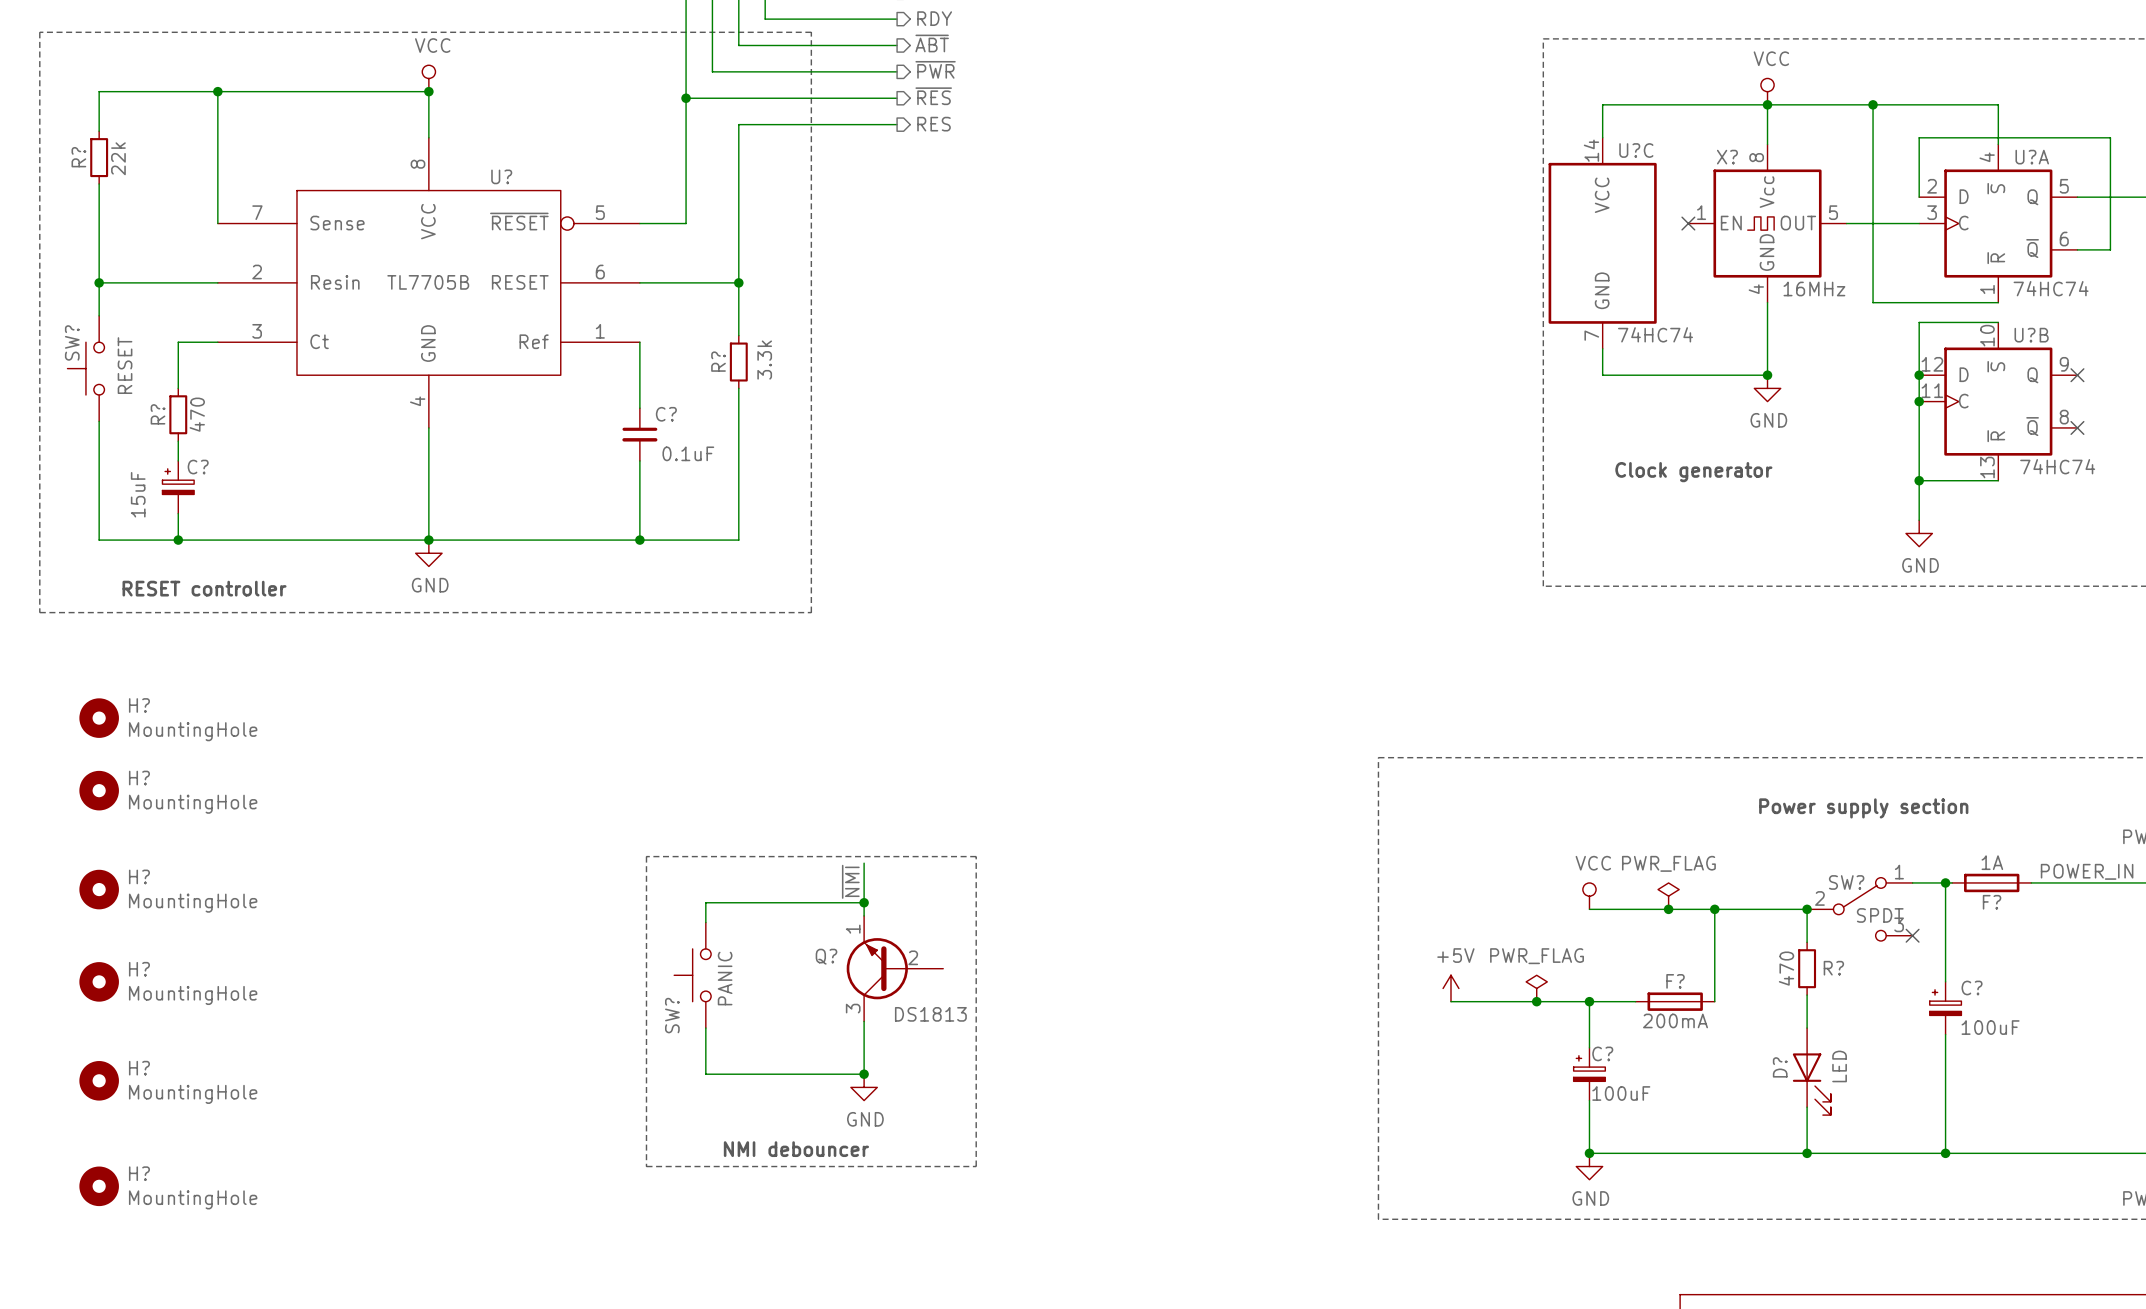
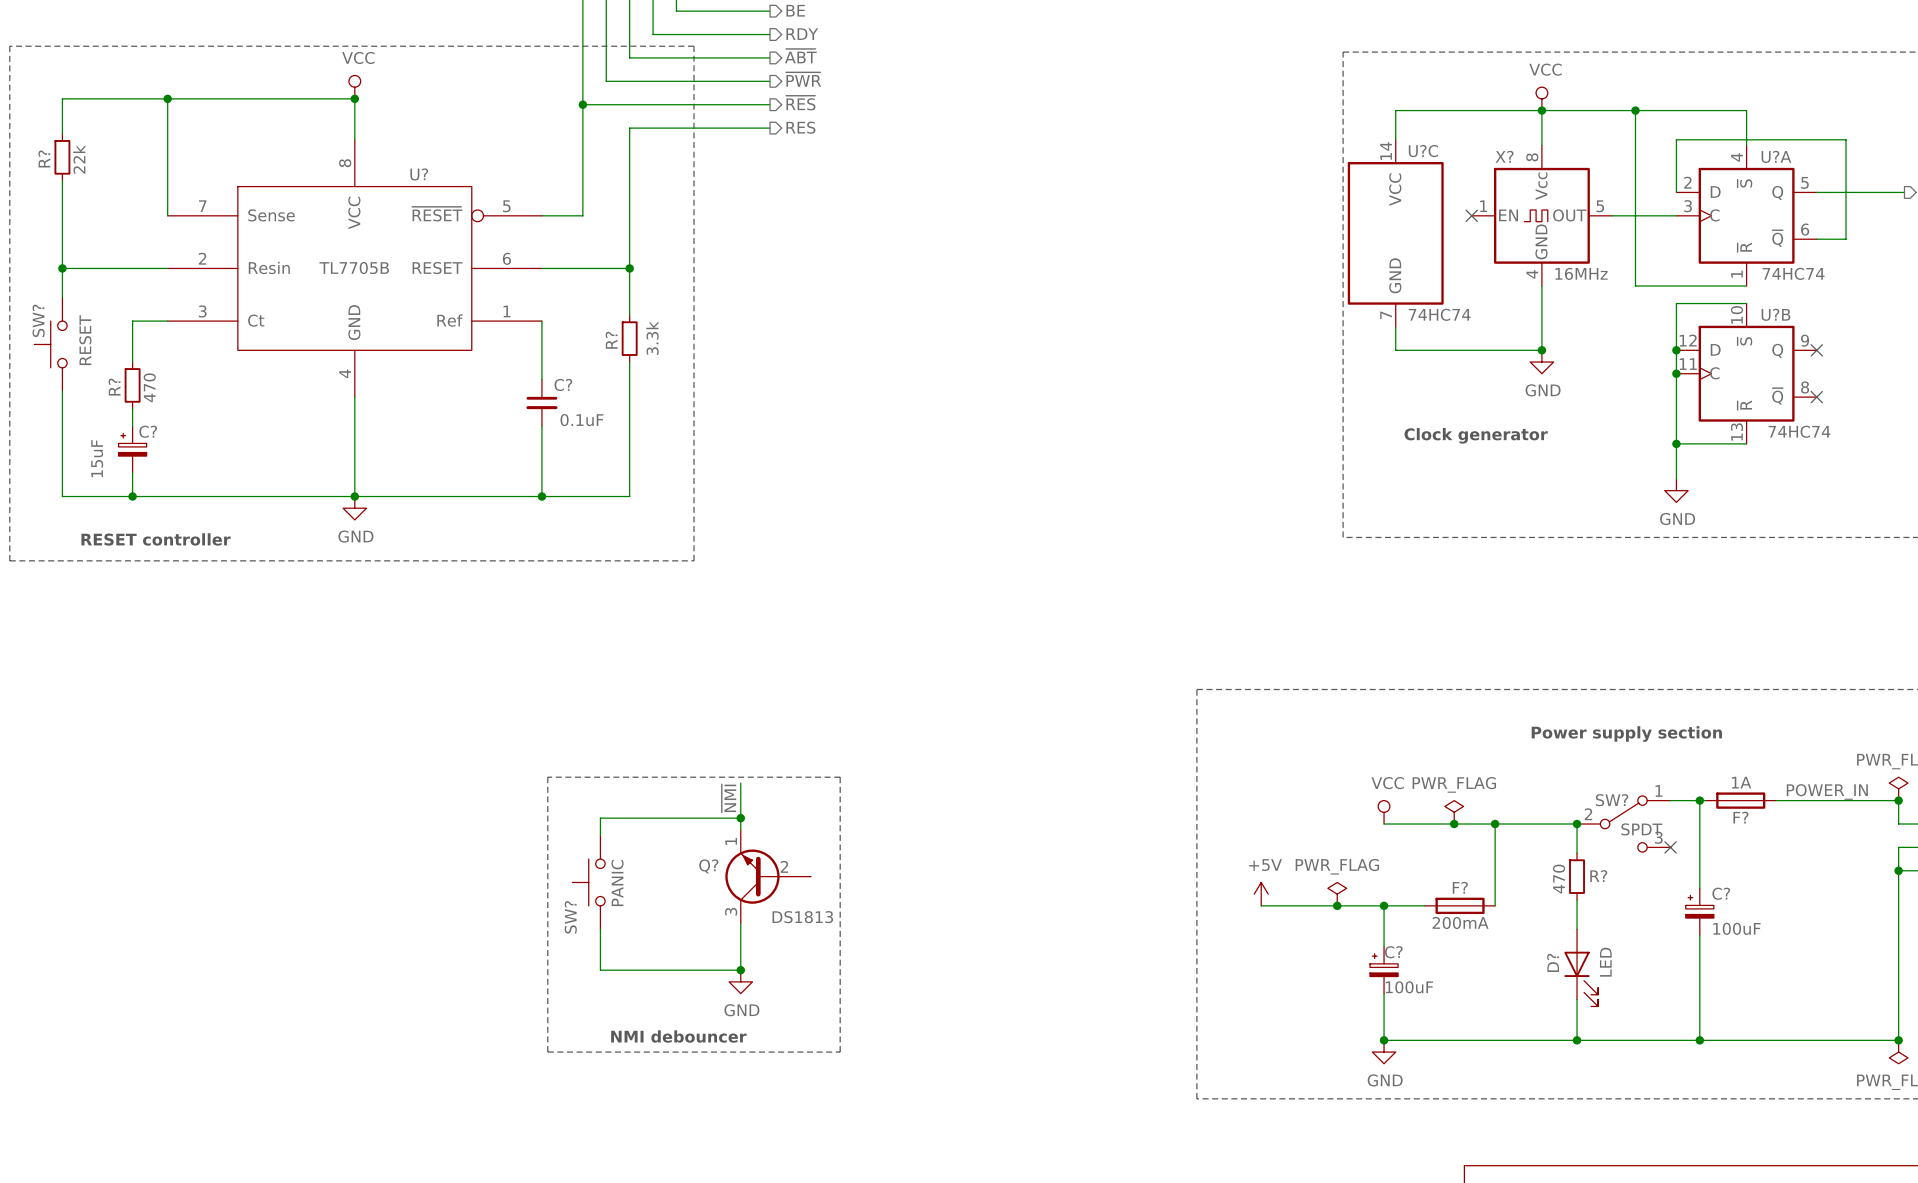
H?: MountingHole (99, 718) -> none
H?: MountingHole (99, 790) -> none
H?: MountingHole (99, 889) -> none
H?: MountingHole (99, 981) -> none
H?: MountingHole (99, 1080) -> none
H?: MountingHole (99, 1186) -> none

